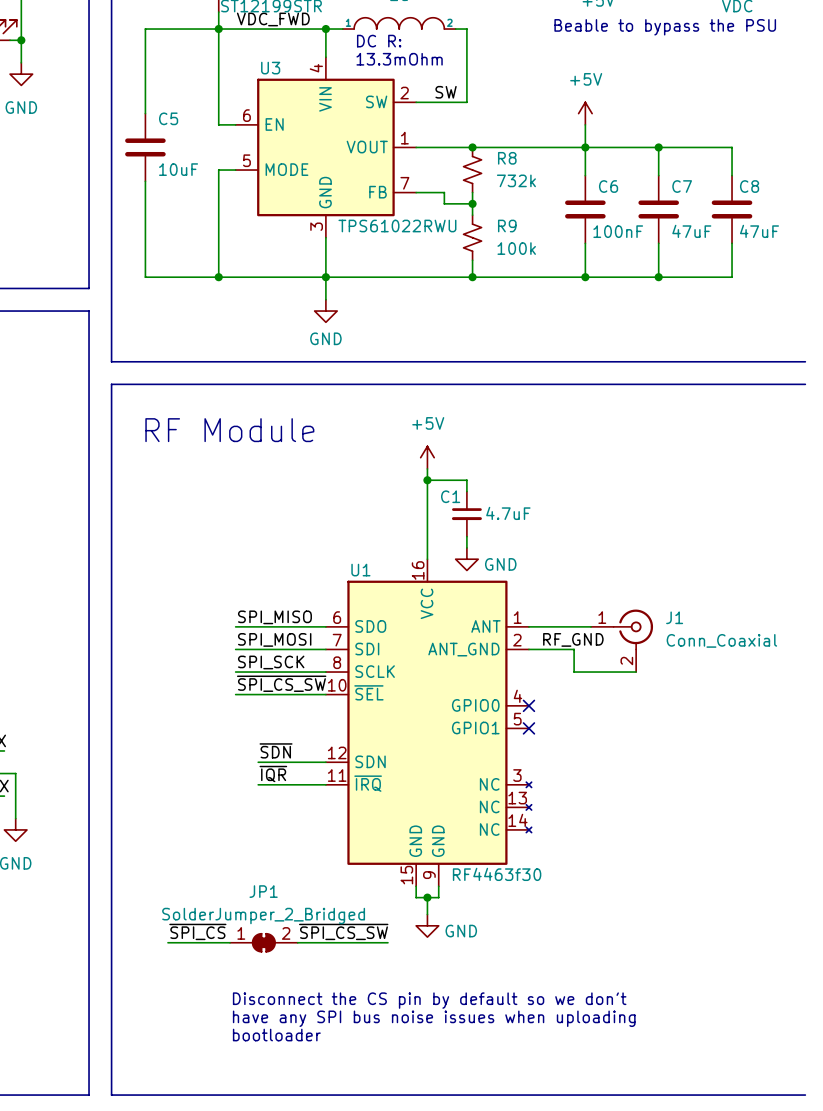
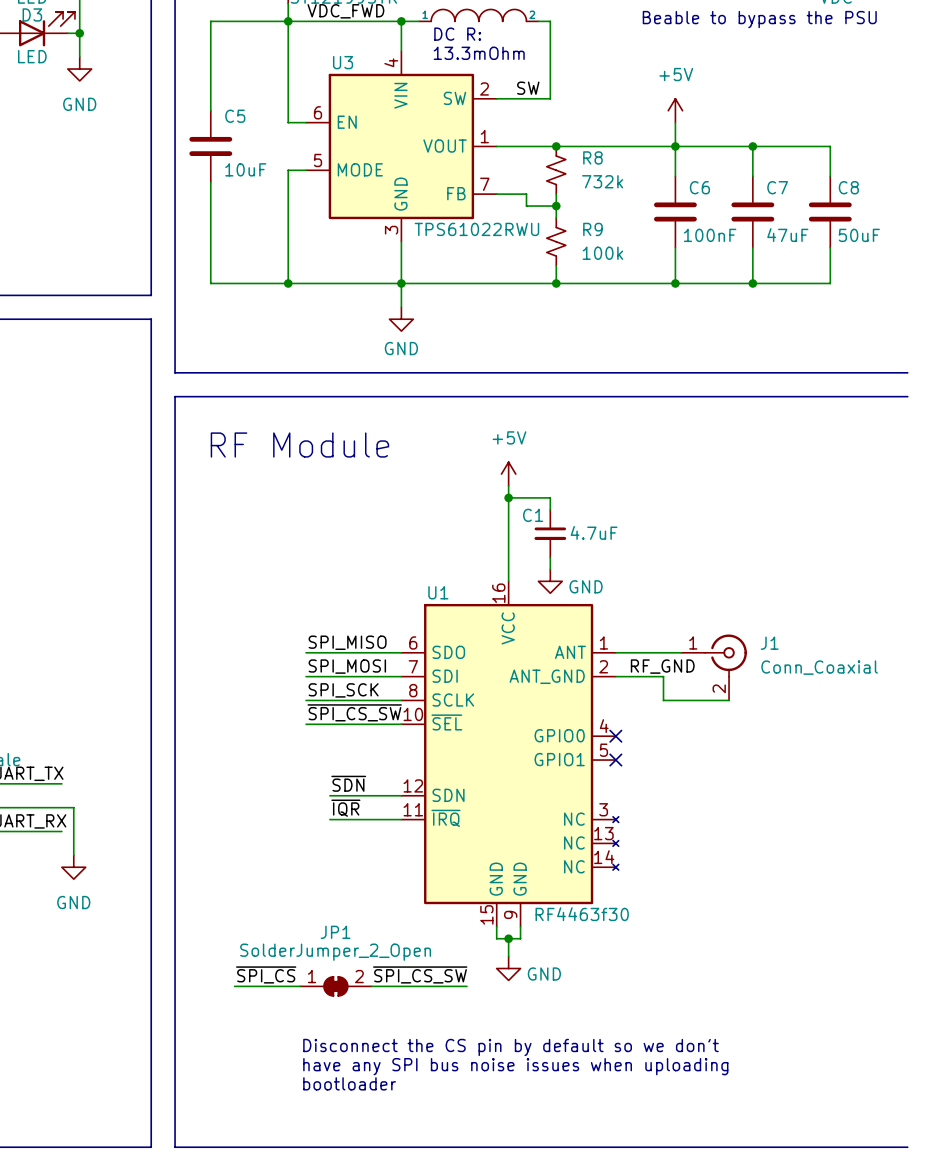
C8 value: 47uF (759, 231) -> 50uF (859, 235)
JP1 value: SolderJumper_2_Bridged (263, 916) -> SolderJumper_2_Open (335, 952)

